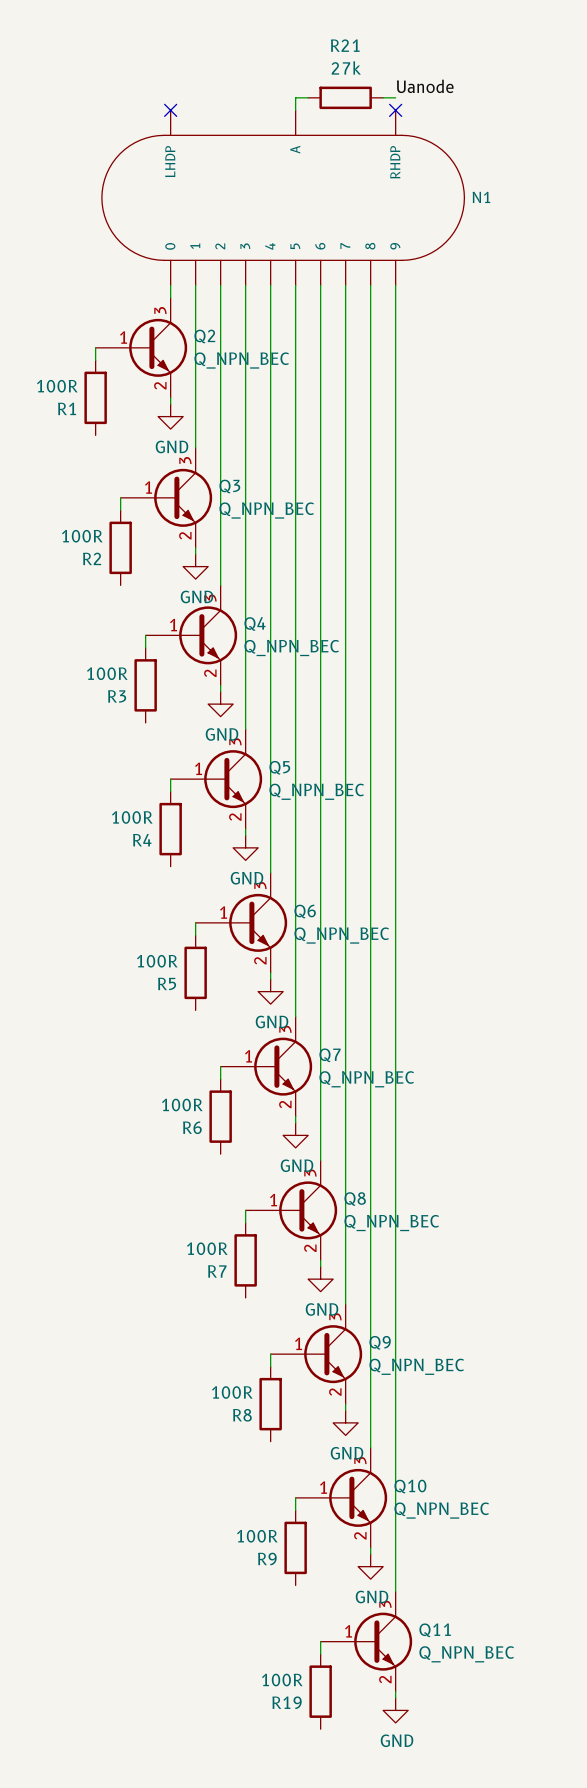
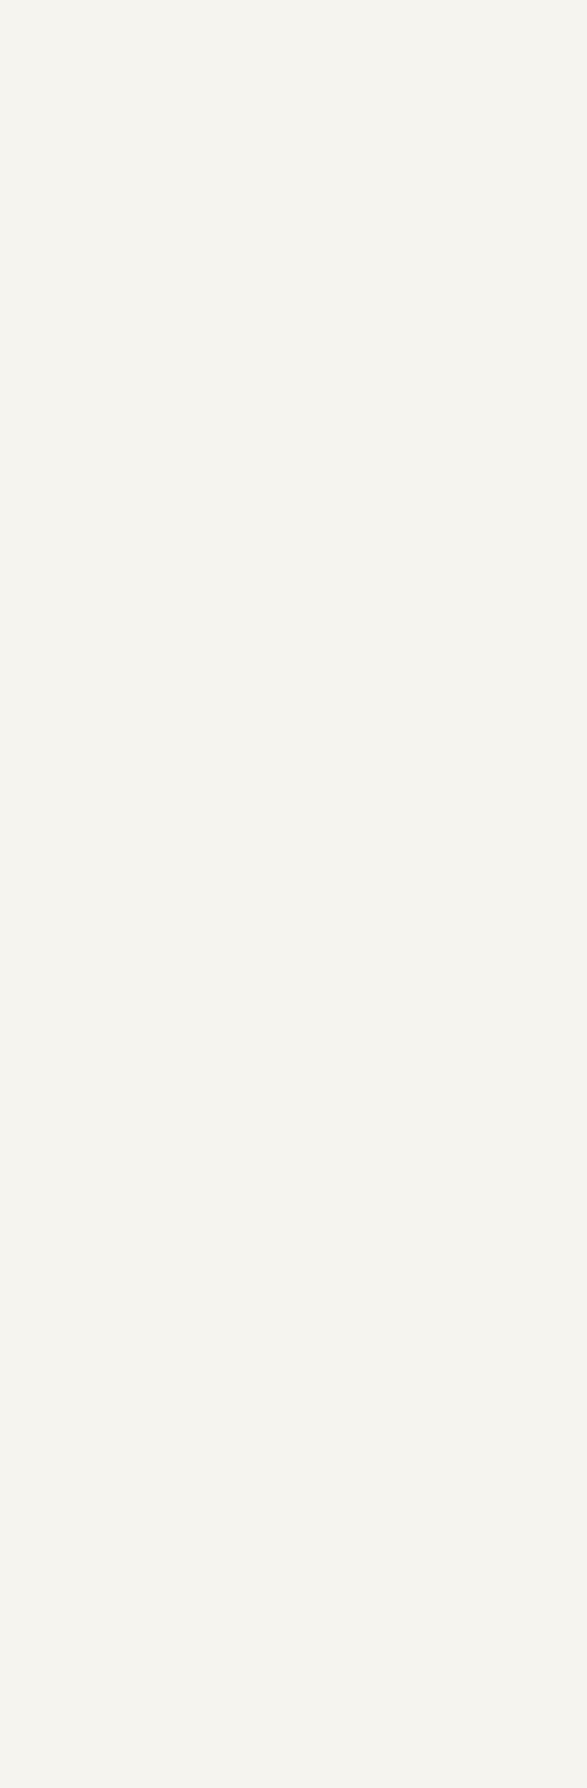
label: Uanode (425, 86) -> none
wire: (308, 97) (295, 97) (295, 110) -> none
R21: 27k (345, 97) -> none
wire: (383, 97) (395, 97) -> none
no-connect mark: (170, 110) -> none
no-connect mark: (395, 110) -> none
N1: (283, 197) -> none
wire: (170, 285) (170, 297) -> none
wire: (195, 285) (195, 447) -> none
wire: (220, 285) (220, 585) -> none
wire: (245, 285) (245, 729) -> none
wire: (270, 285) (270, 872) -> none
wire: (295, 285) (295, 1016) -> none
wire: (320, 285) (320, 1160) -> none
wire: (345, 285) (345, 1304) -> none
wire: (370, 285) (370, 1447) -> none
wire: (395, 285) (395, 1591) -> none
wire: (95, 347) (95, 360) -> none
Q2: Q_NPN_BEC (141, 347) -> none
R1: 100R (95, 397) -> none
wire: (170, 397) (170, 404) -> none
power symbol: GND (170, 416) -> none
wire: (120, 497) (120, 510) -> none
Q3: Q_NPN_BEC (166, 497) -> none
R2: 100R (120, 547) -> none
wire: (195, 547) (195, 554) -> none
power symbol: GND (195, 566) -> none
wire: (145, 635) (145, 647) -> none
Q4: Q_NPN_BEC (191, 635) -> none
R3: 100R (145, 685) -> none
wire: (220, 685) (220, 691) -> none
power symbol: GND (220, 704) -> none
wire: (170, 779) (170, 791) -> none
Q5: Q_NPN_BEC (216, 779) -> none
R4: 100R (170, 829) -> none
wire: (245, 829) (245, 835) -> none
power symbol: GND (245, 847) -> none
wire: (195, 922) (195, 935) -> none
Q6: Q_NPN_BEC (241, 922) -> none
R5: 100R (195, 972) -> none
wire: (270, 972) (270, 979) -> none
power symbol: GND (270, 991) -> none
wire: (220, 1066) (220, 1079) -> none
Q7: Q_NPN_BEC (266, 1066) -> none
R6: 100R (220, 1116) -> none
wire: (295, 1116) (295, 1122) -> none
power symbol: GND (295, 1135) -> none
wire: (245, 1210) (245, 1222) -> none
Q8: Q_NPN_BEC (291, 1210) -> none
R7: 100R (245, 1260) -> none
wire: (320, 1260) (320, 1266) -> none
power symbol: GND (320, 1279) -> none
wire: (270, 1354) (270, 1366) -> none
Q9: Q_NPN_BEC (316, 1354) -> none
R8: 100R (270, 1404) -> none
wire: (345, 1404) (345, 1410) -> none
power symbol: GND (345, 1422) -> none
wire: (295, 1497) (295, 1510) -> none
Q10: Q_NPN_BEC (341, 1497) -> none
R9: 100R (295, 1547) -> none
wire: (370, 1547) (370, 1554) -> none
power symbol: GND (370, 1566) -> none
wire: (320, 1641) (320, 1654) -> none
Q11: Q_NPN_BEC (366, 1641) -> none
R19: 100R (320, 1691) -> none
wire: (395, 1691) (395, 1697) -> none
power symbol: GND (395, 1710) -> none

